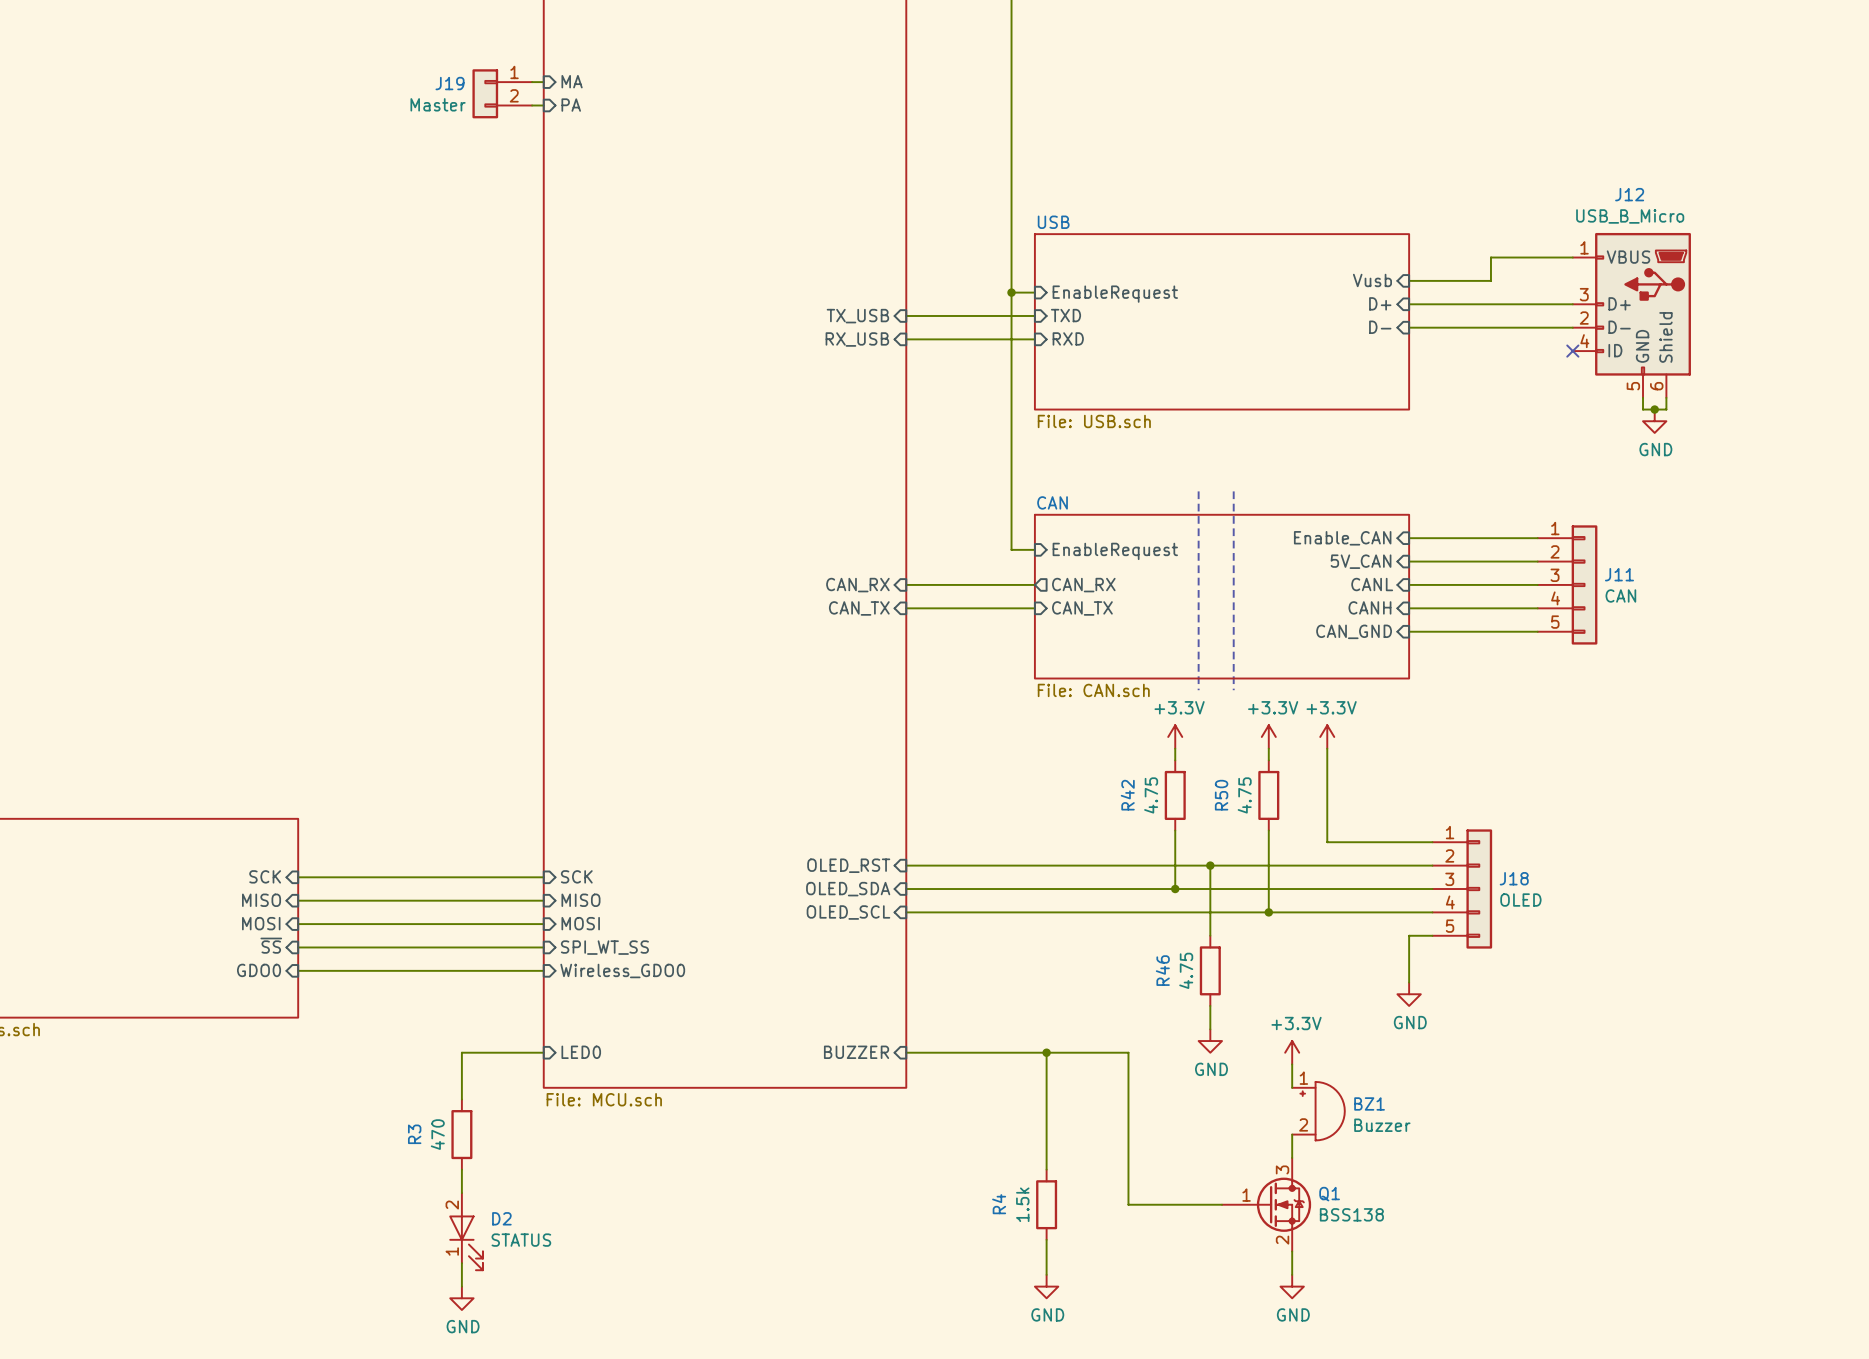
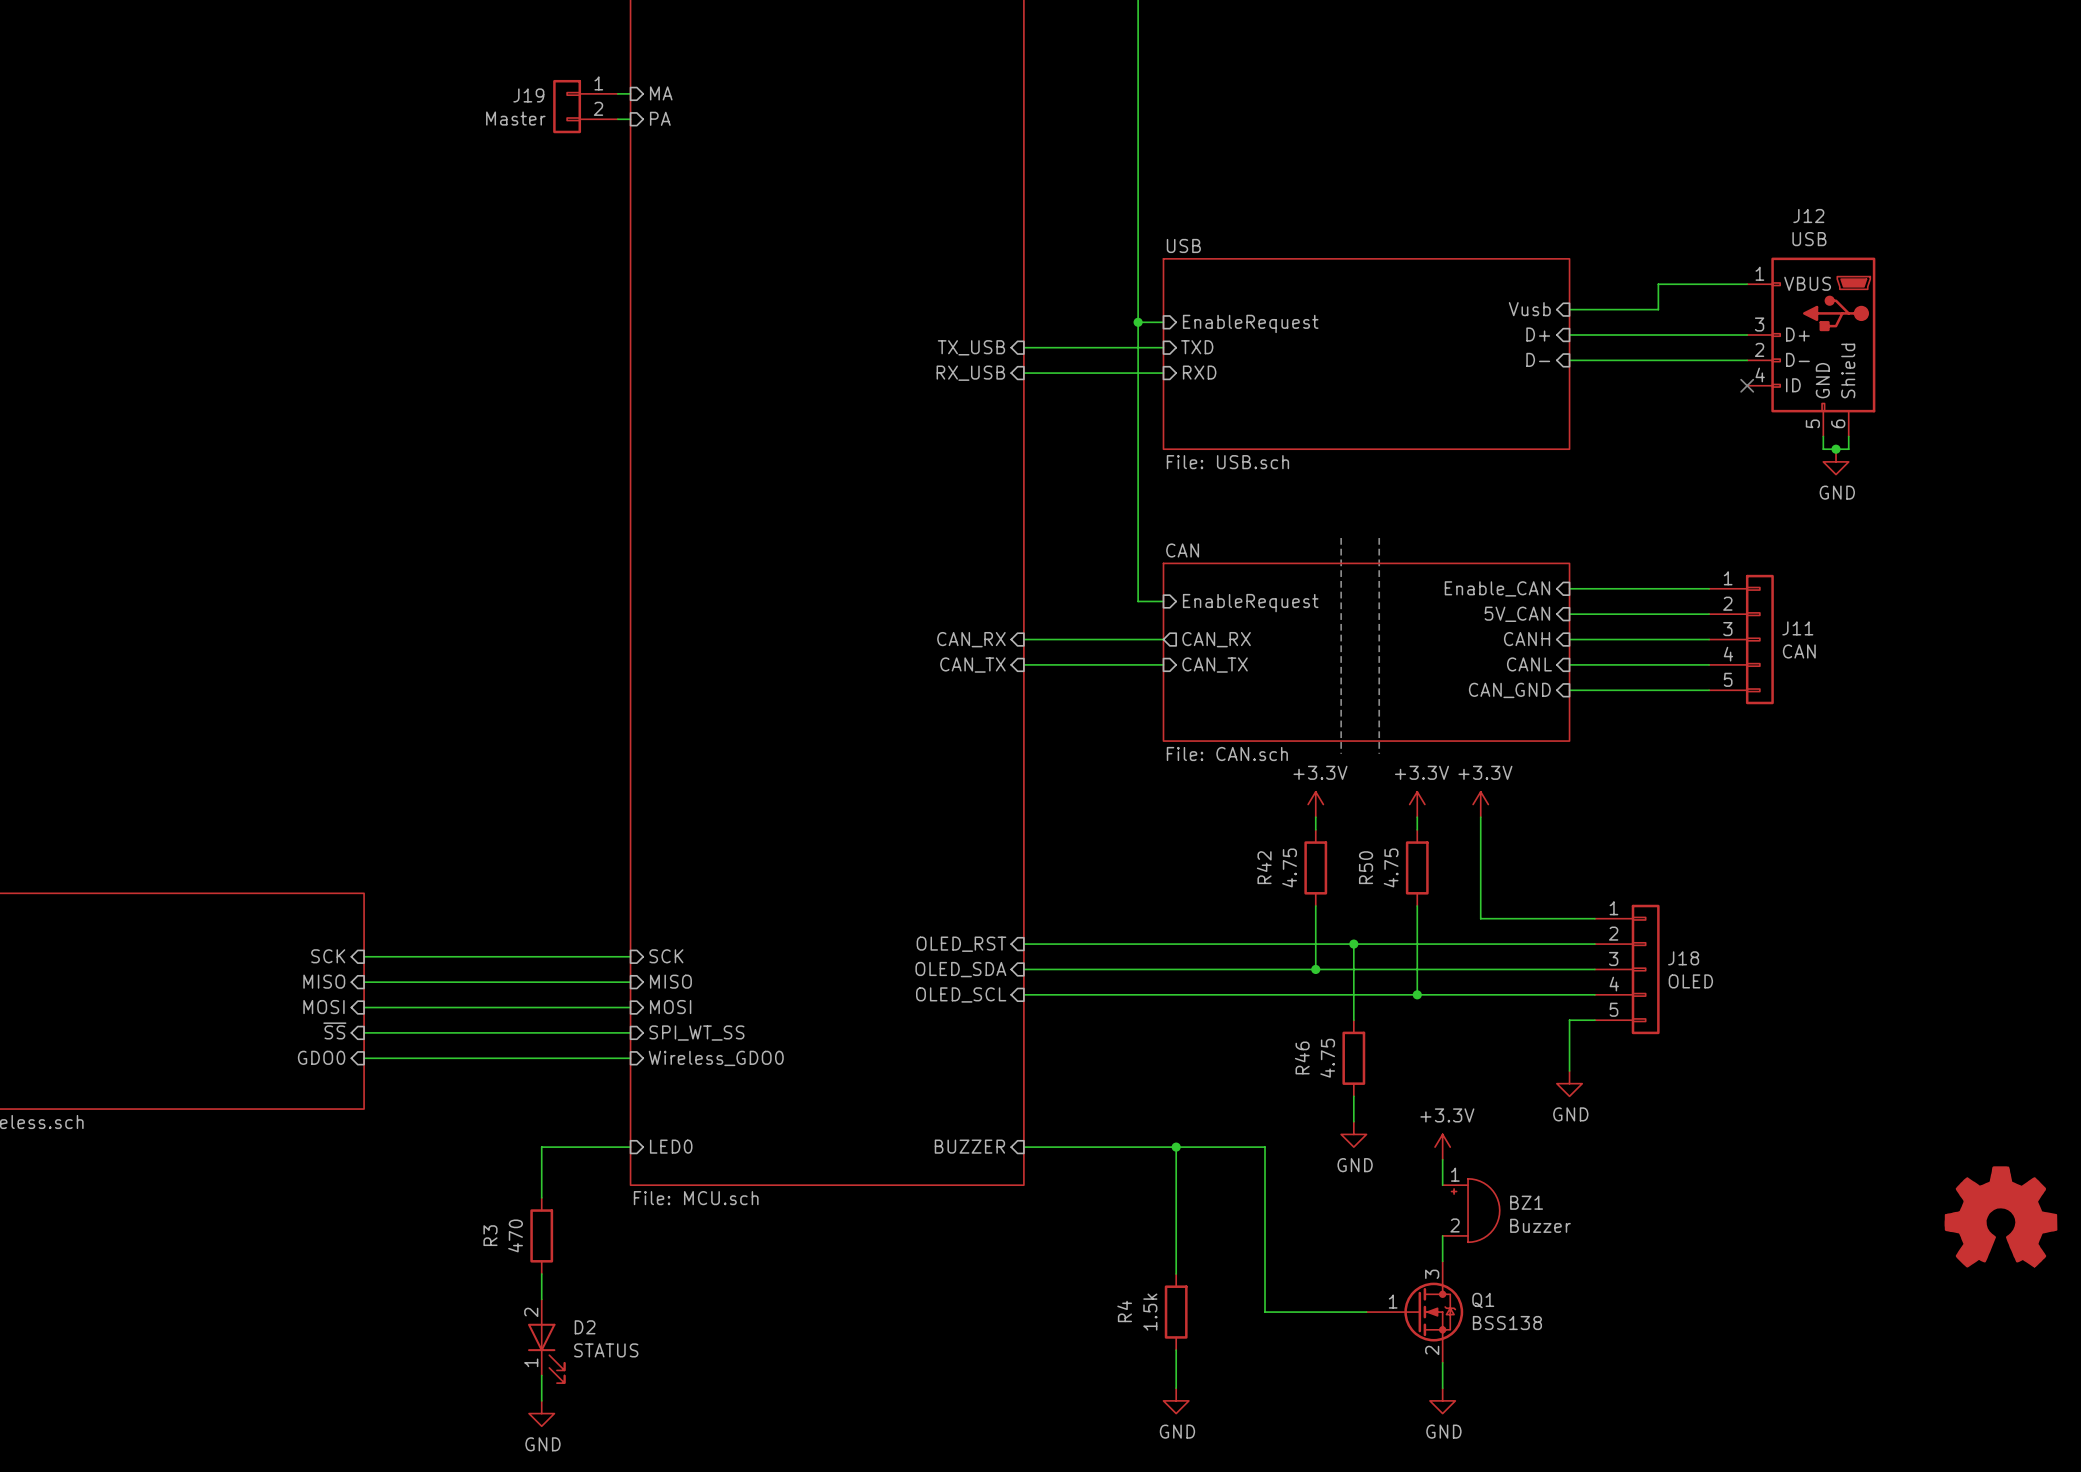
J12 value: USB_B_Micro (1630, 216) -> USB (1809, 239)
sheet pin: CANL (1372, 584) -> CANH (1527, 639)
sheet pin: CANH (1369, 607) -> CANL (1529, 664)
part: none -> (2000, 1216)

